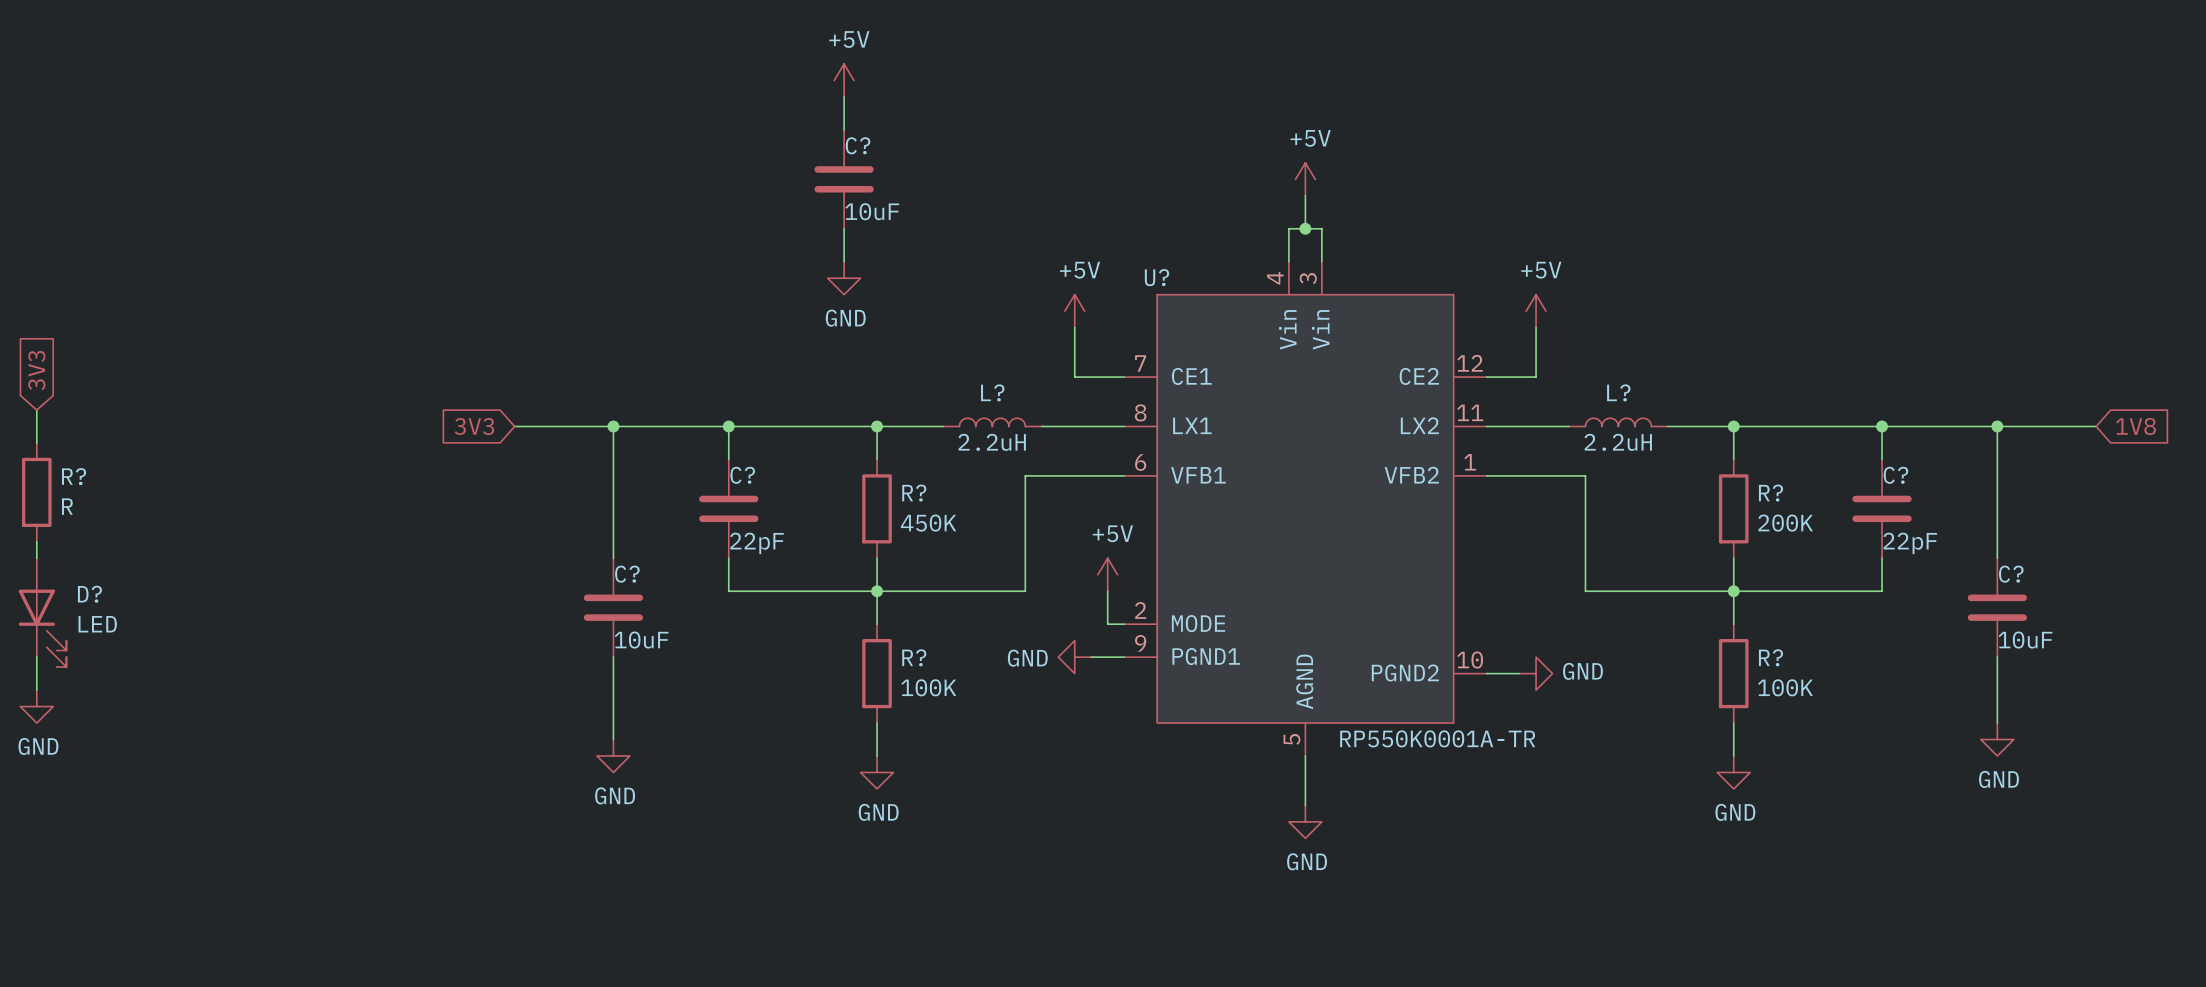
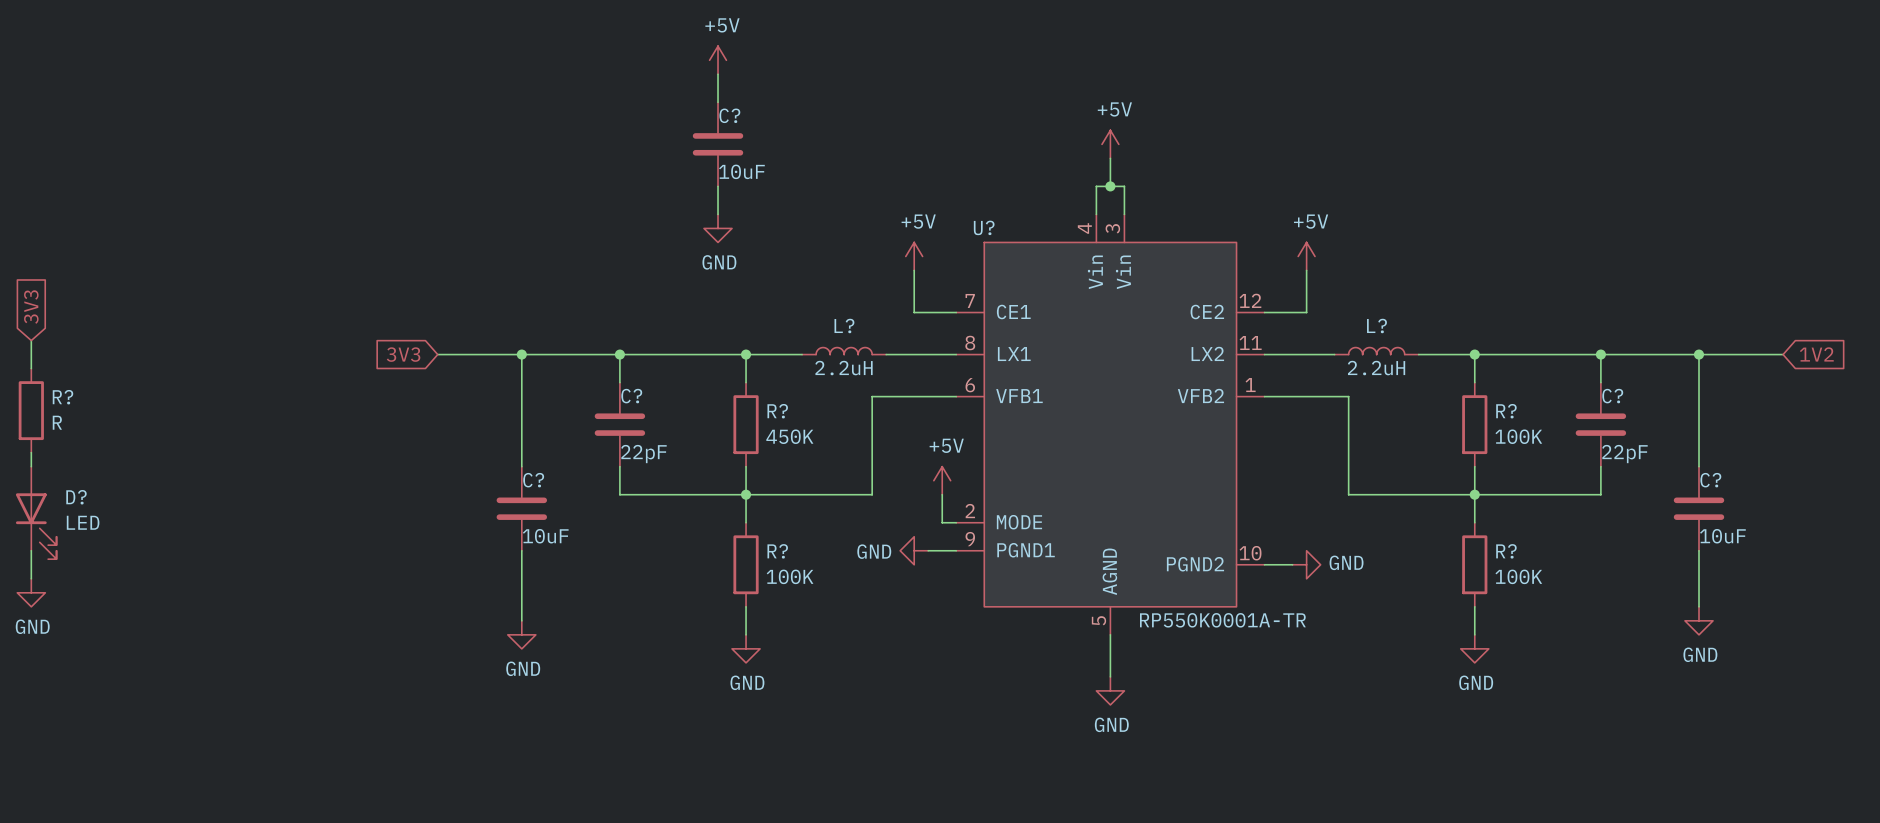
global label: 1V8 (2135, 426) -> 1V2 (1816, 354)
R? value: 200K (1785, 523) -> 100K (1518, 436)

